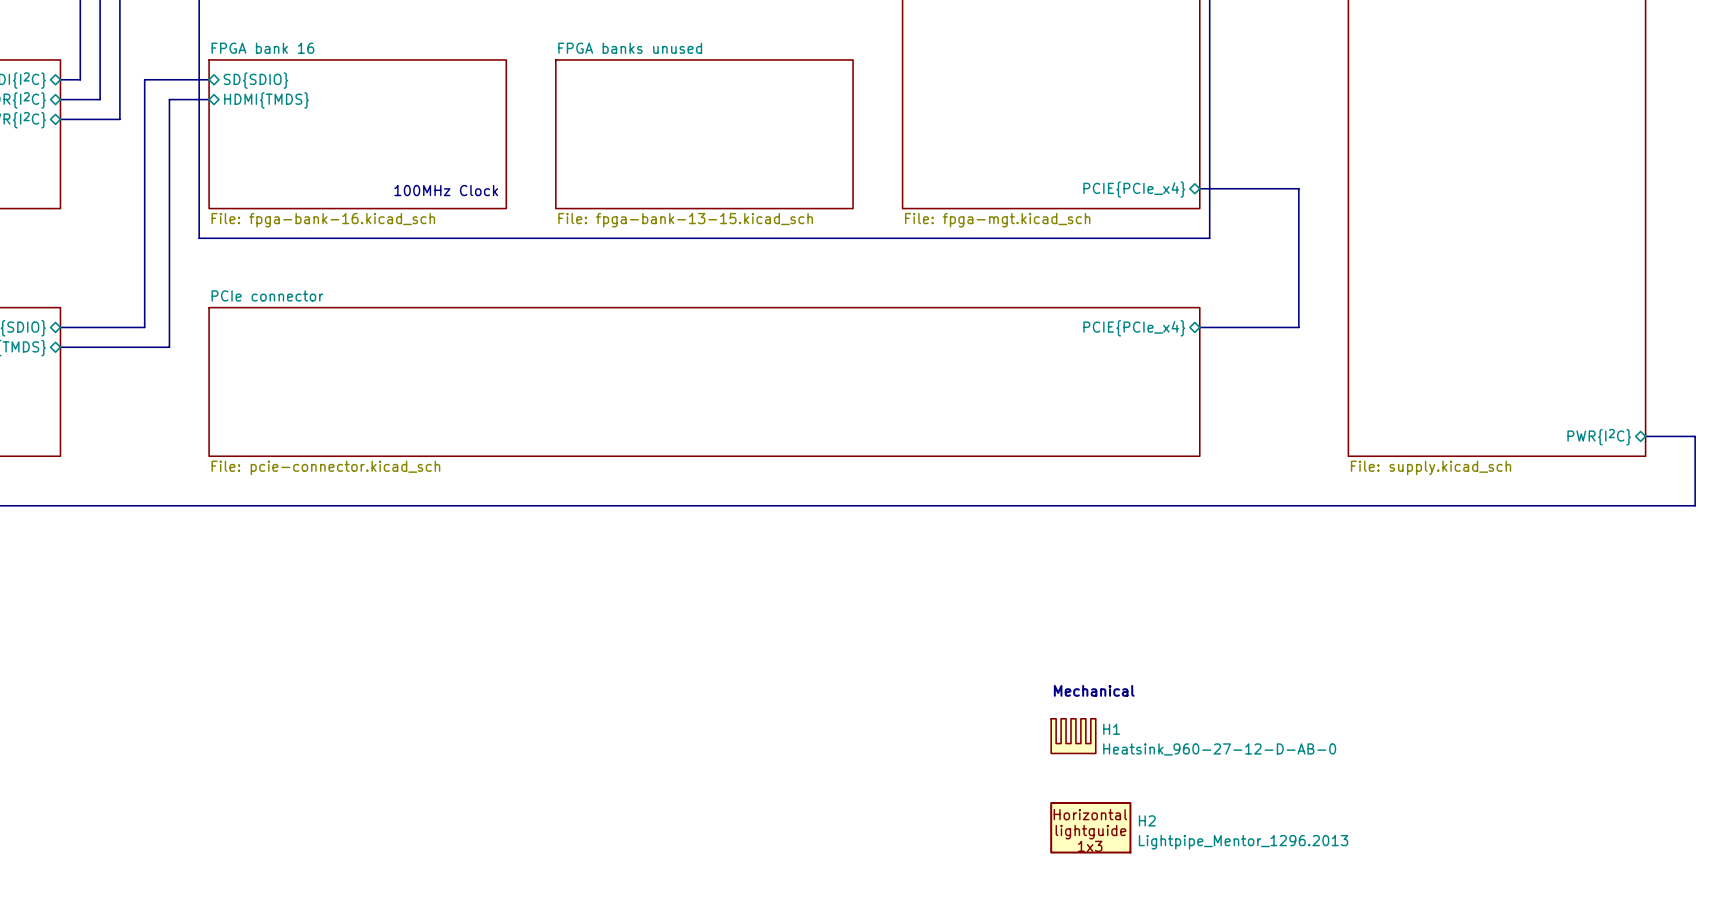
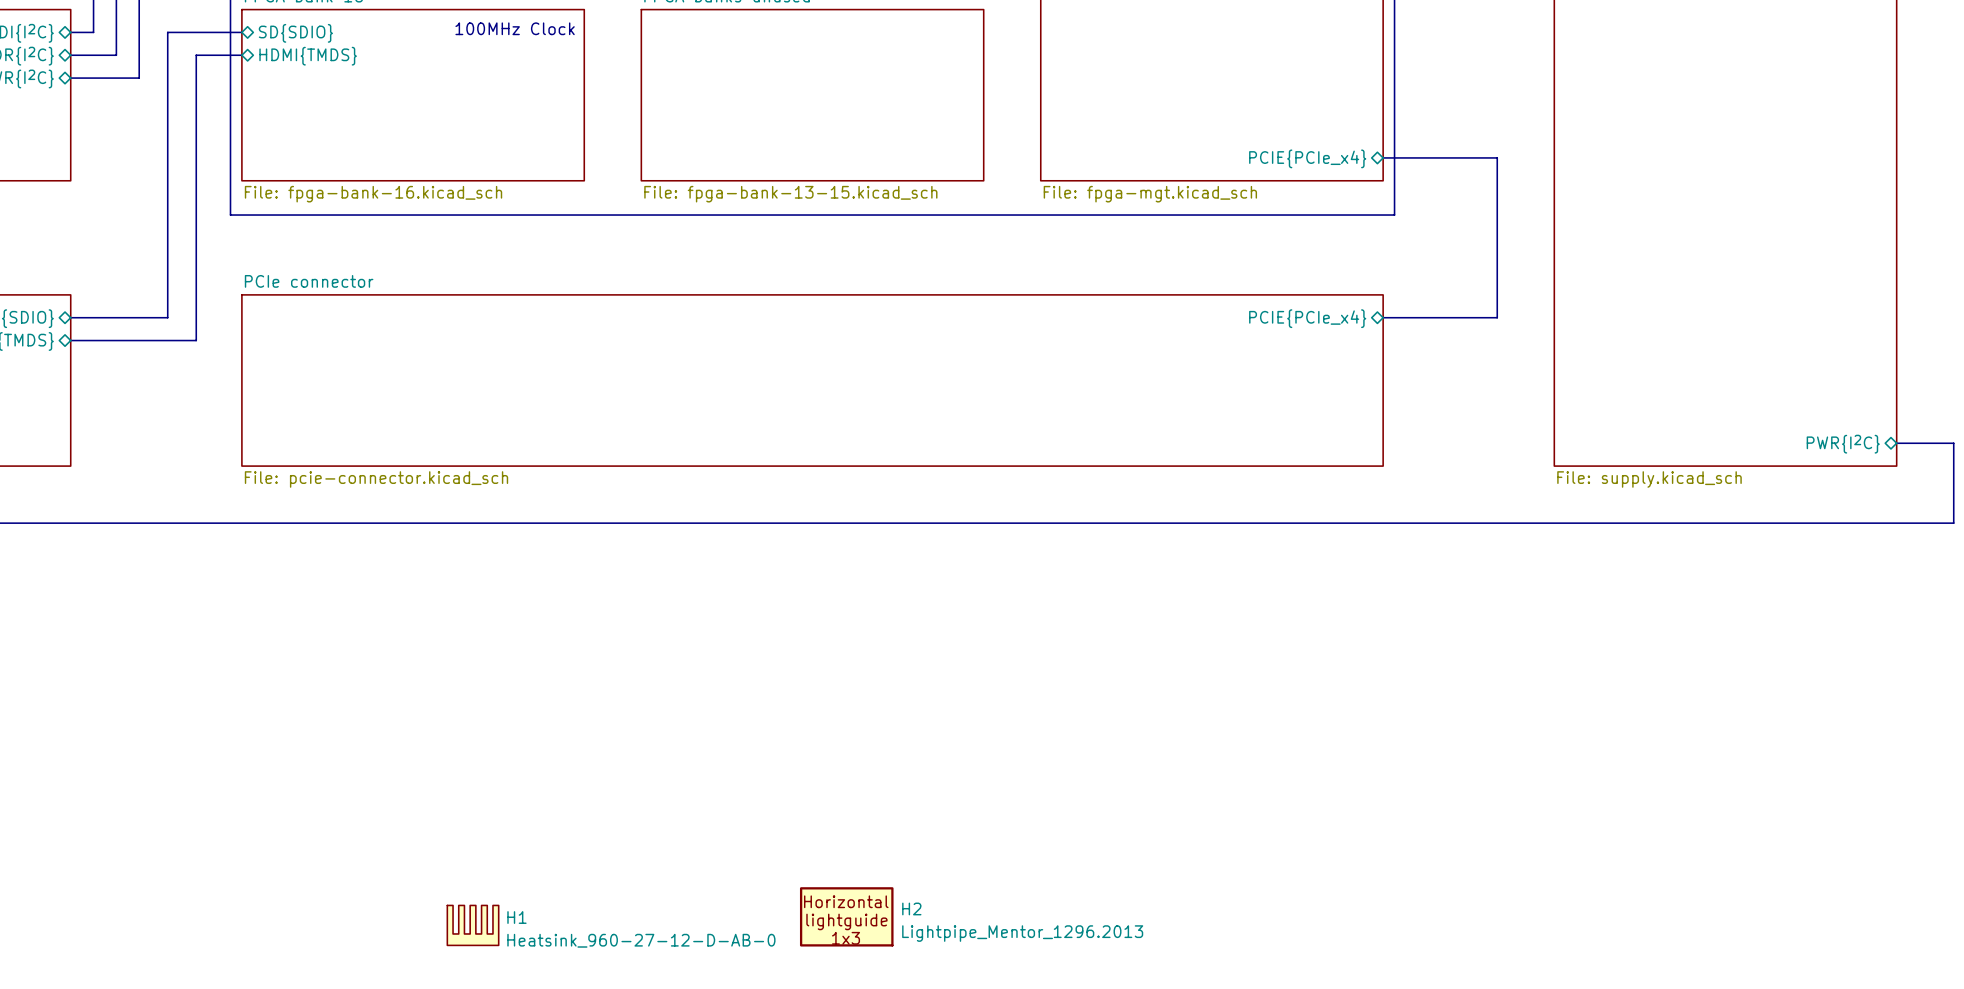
text position: 100MHz Clock (446, 190) -> 100MHz Clock (515, 28)
text: Mechanical (1094, 690) -> none
H1 position: (1073, 736) -> (473, 925)
H2 position: (1090, 827) -> (846, 916)

